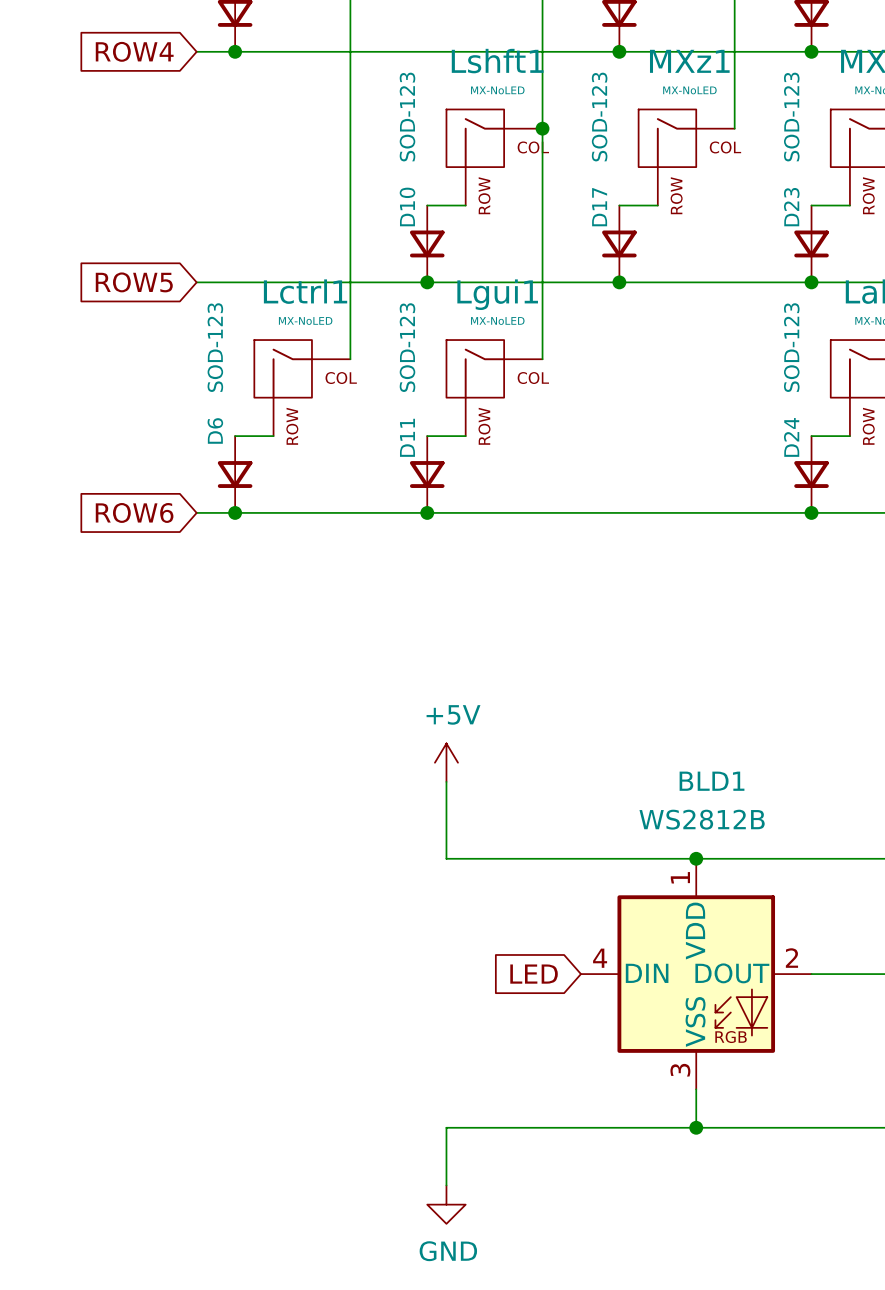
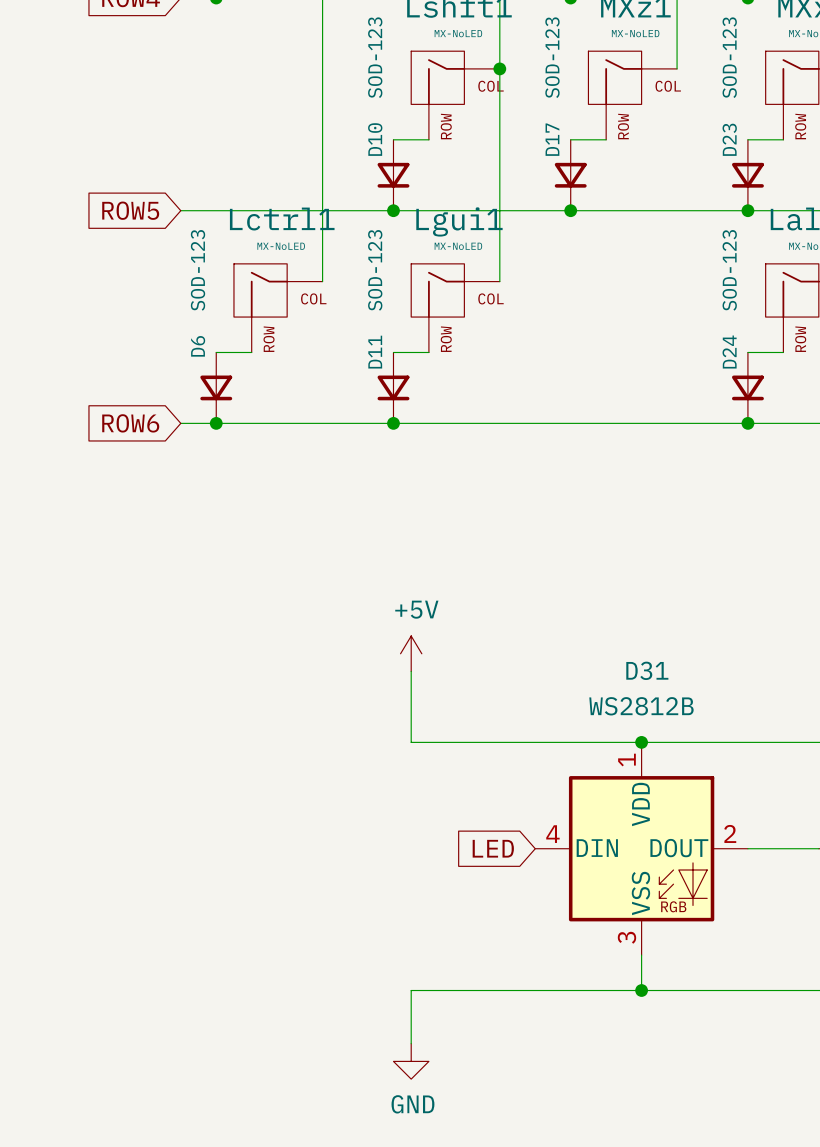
BLD1 name: BLD1 (712, 781) -> D31 (647, 670)

